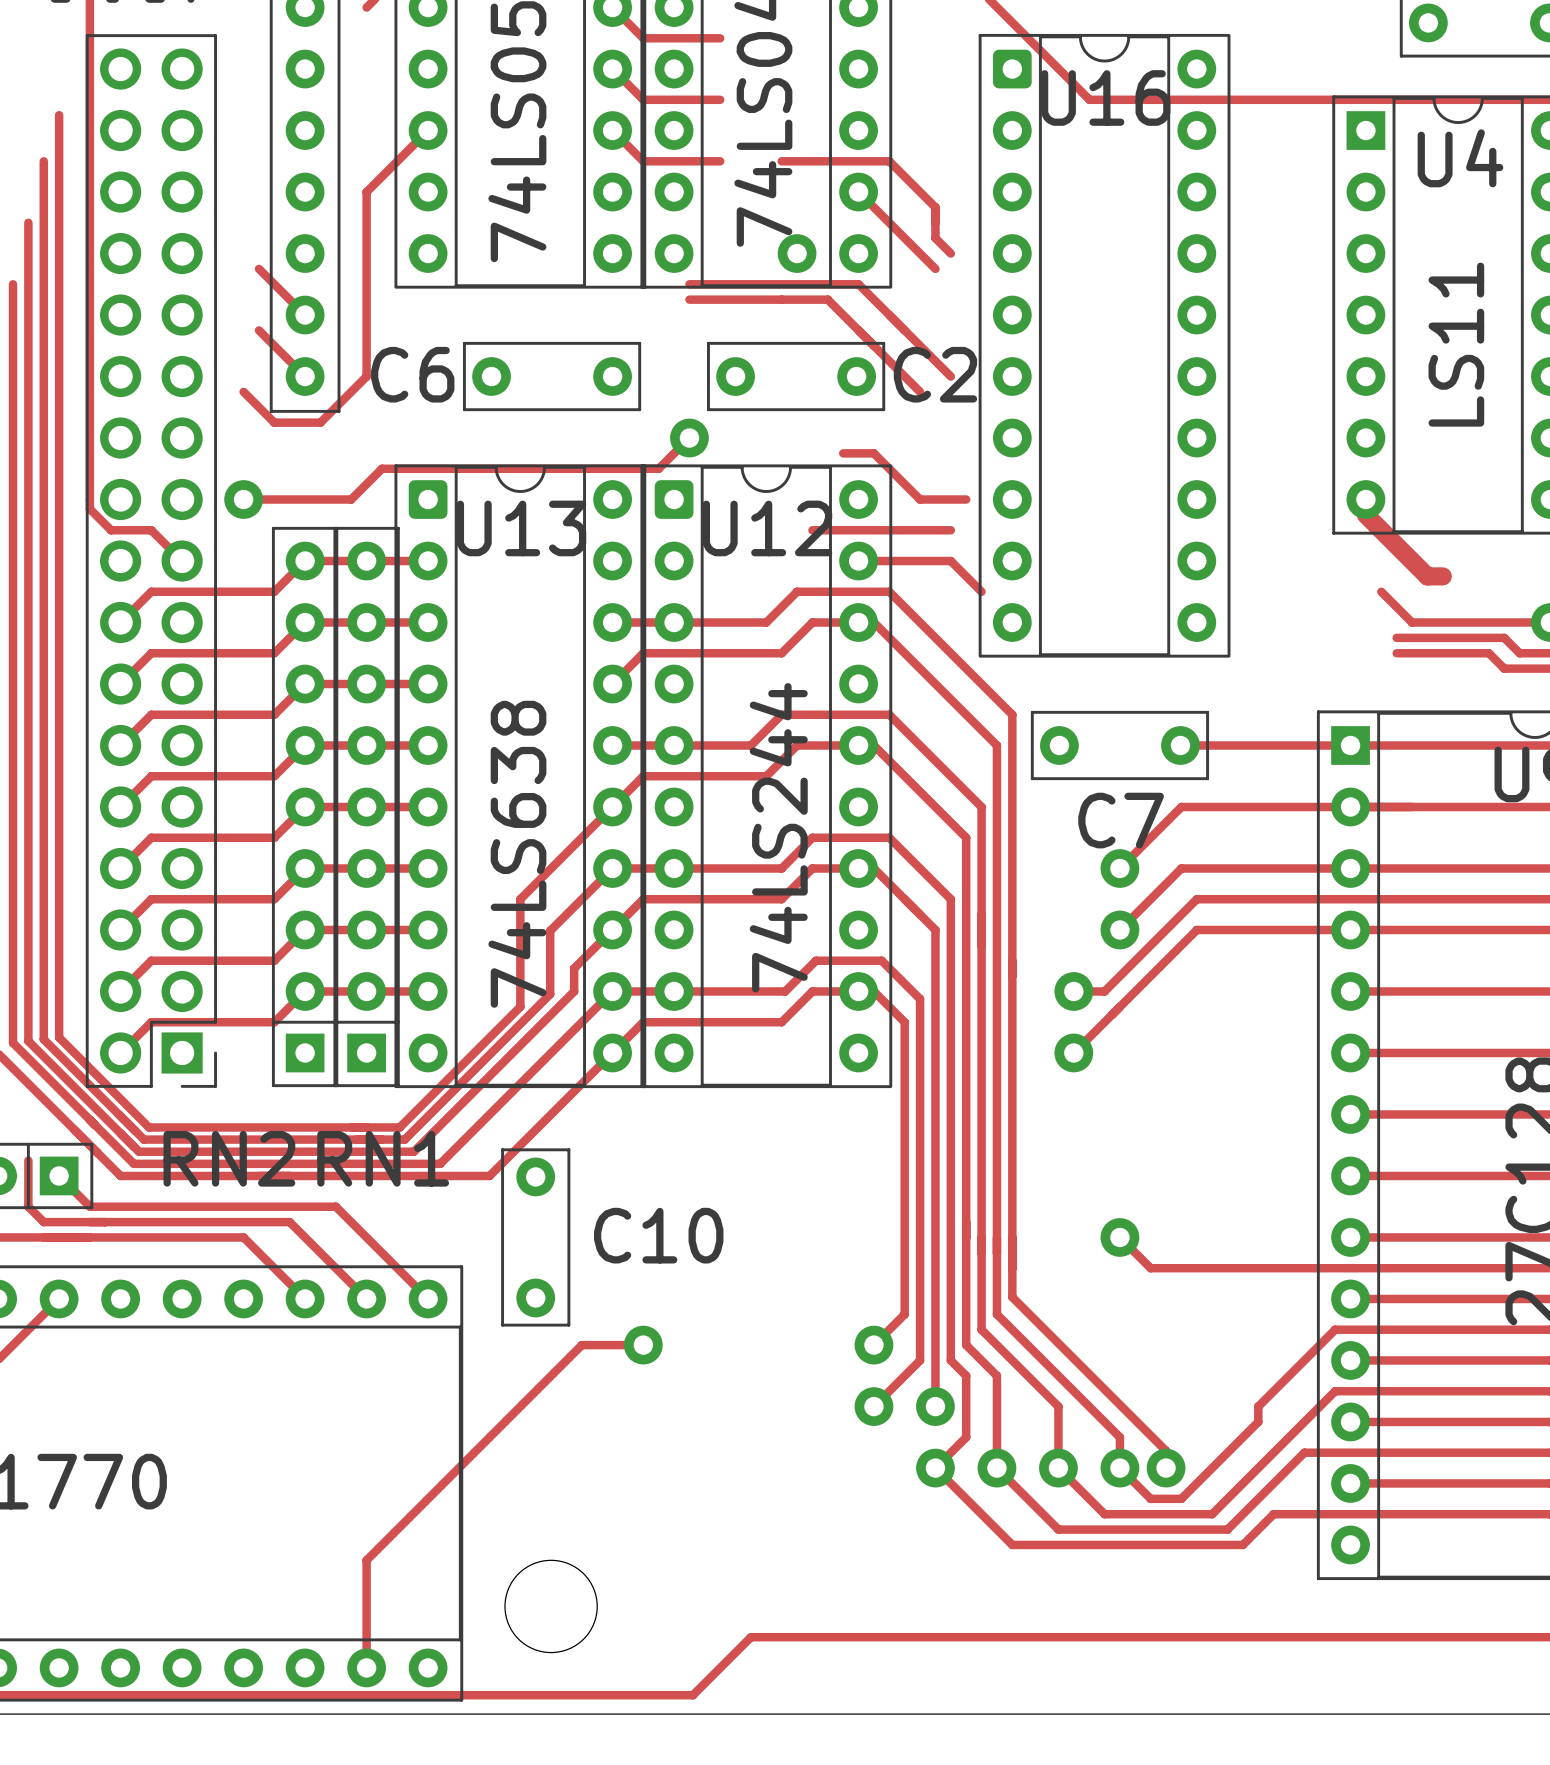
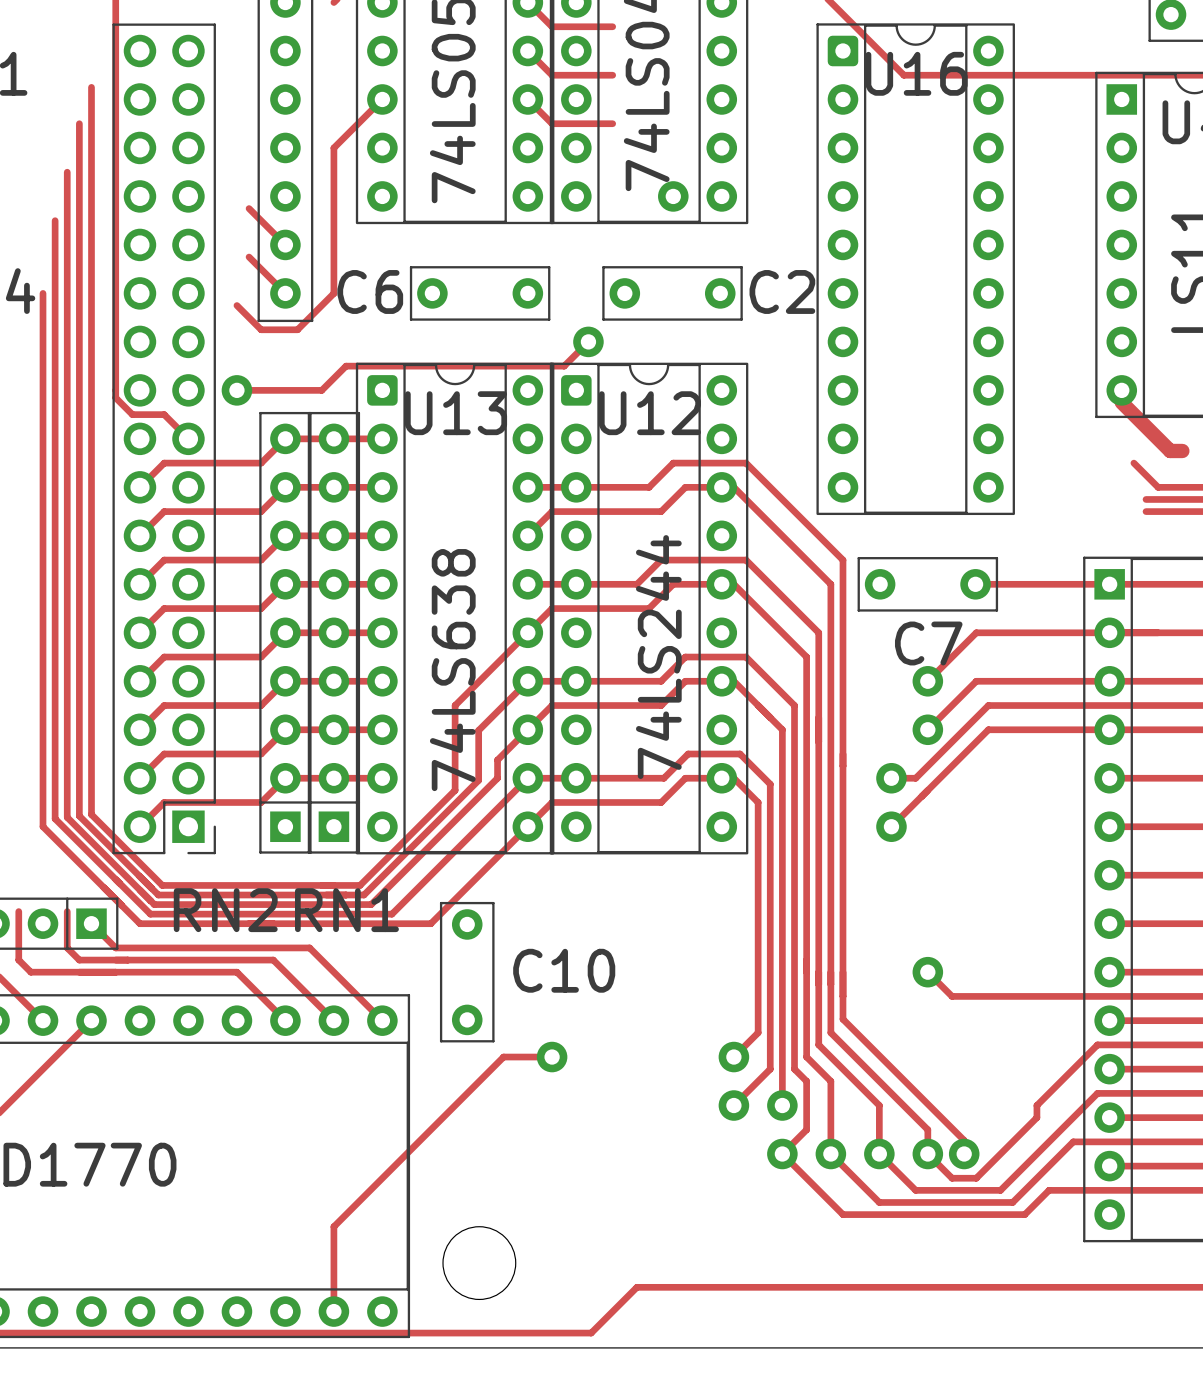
track: (781, 161) (889, 161) (935, 207) (935, 238) (950, 253) -> none
track: (858, 192) (935, 268) -> none
track: (689, 284) (858, 284) (950, 376) -> none
track: (689, 299) (827, 299) (920, 391) -> none
track: (843, 453) (873, 453) (920, 499) (966, 499) -> none
track: (812, 530) (950, 530) -> none
track: (858, 561) (950, 561) (981, 591) -> none

